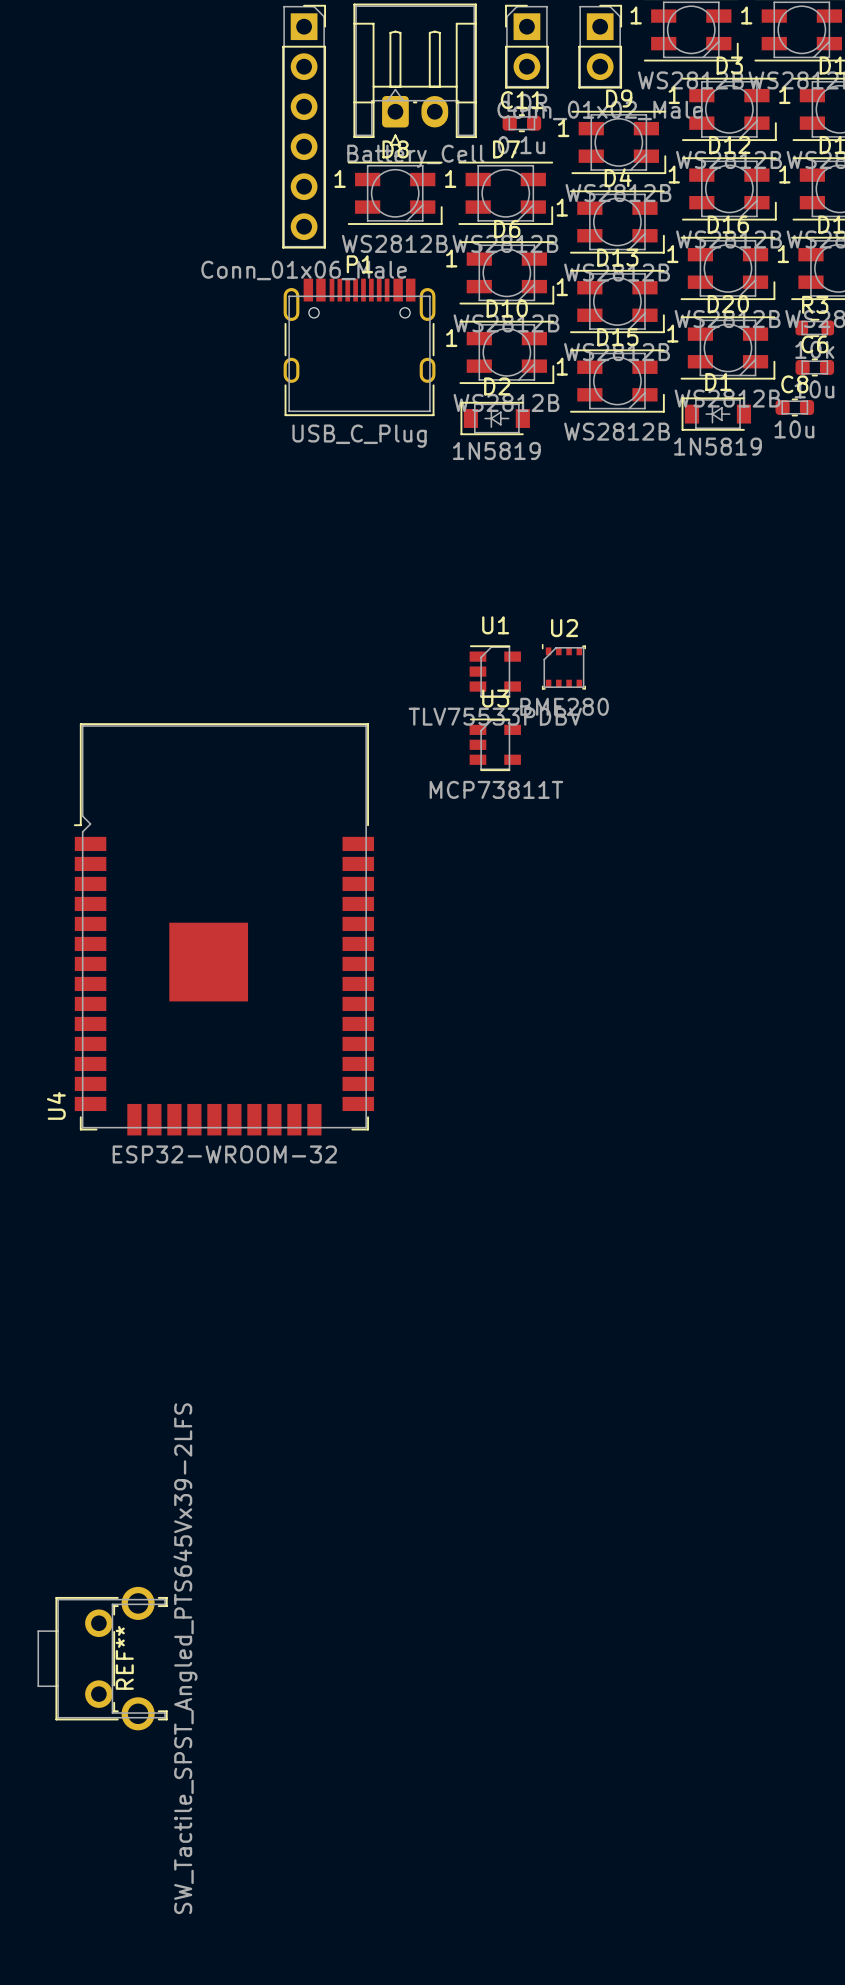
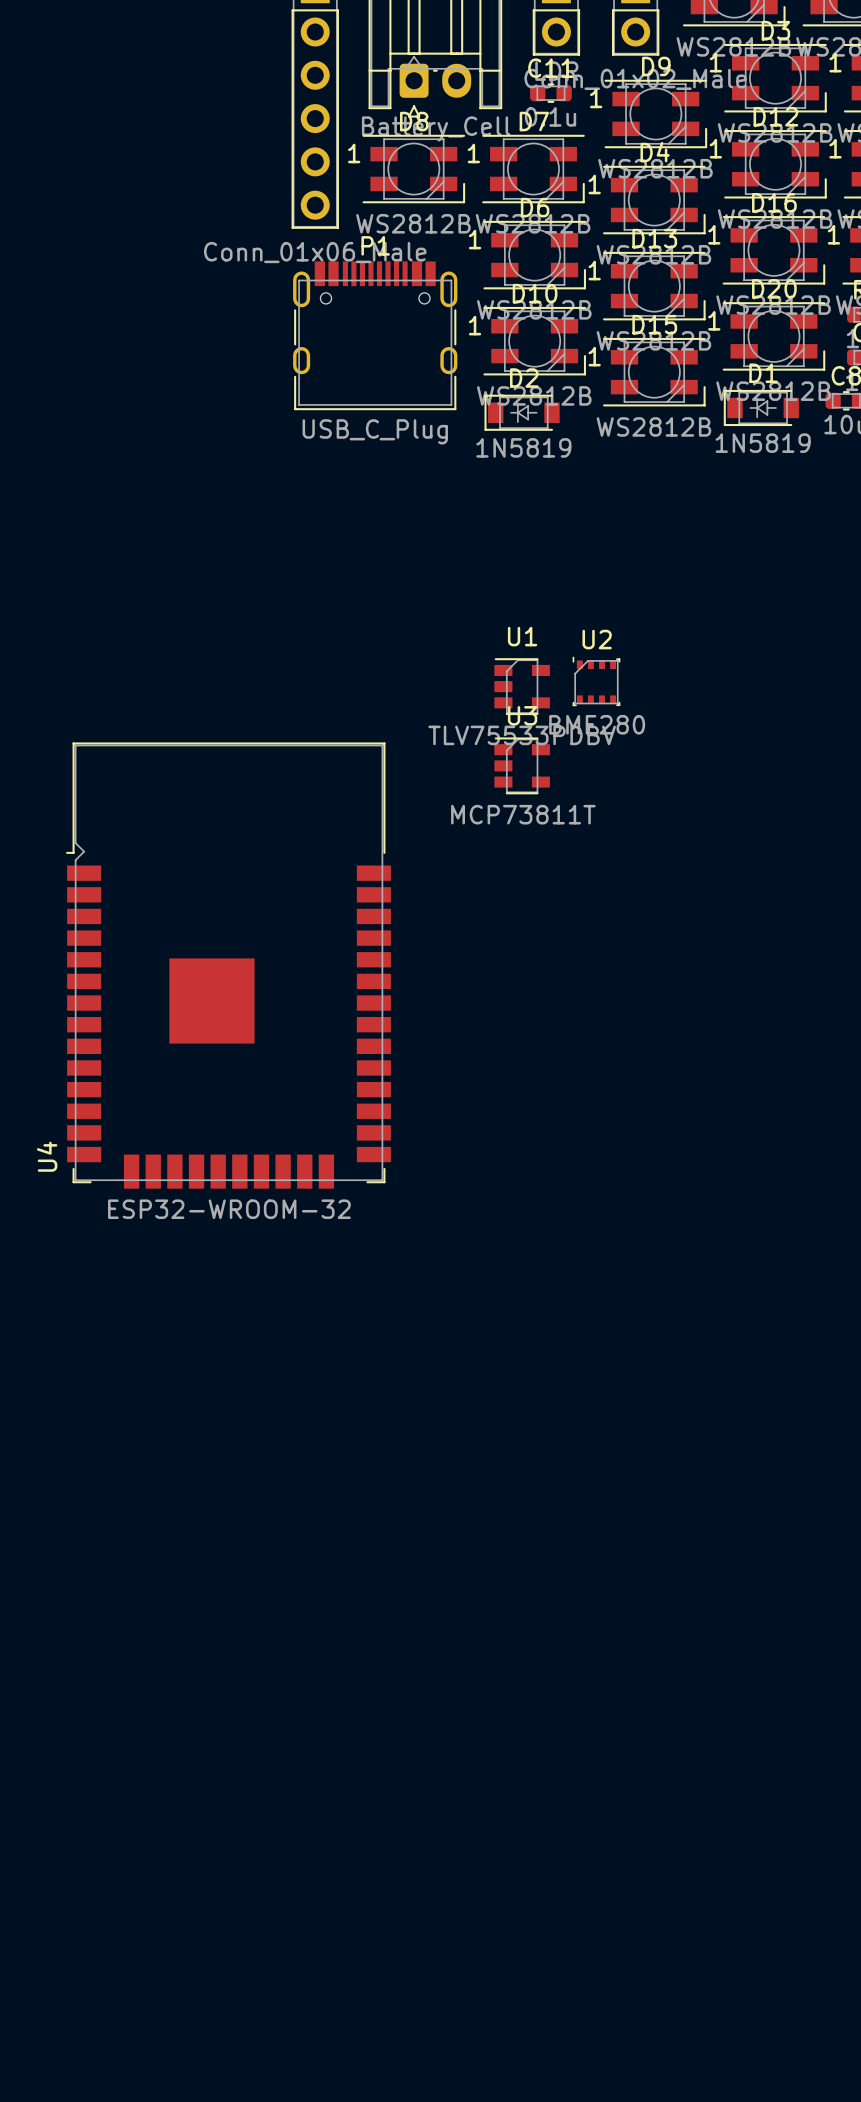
REF**: SW_Tactile_SPST_Angled_PTS645Vx39-2LFS (102, 1658) -> none

